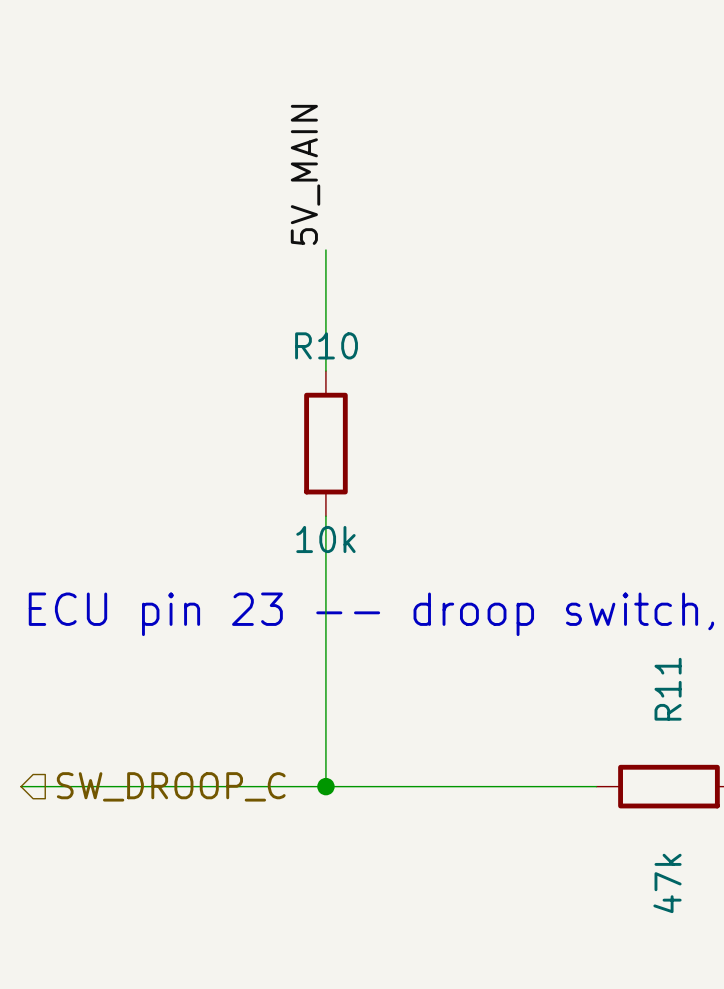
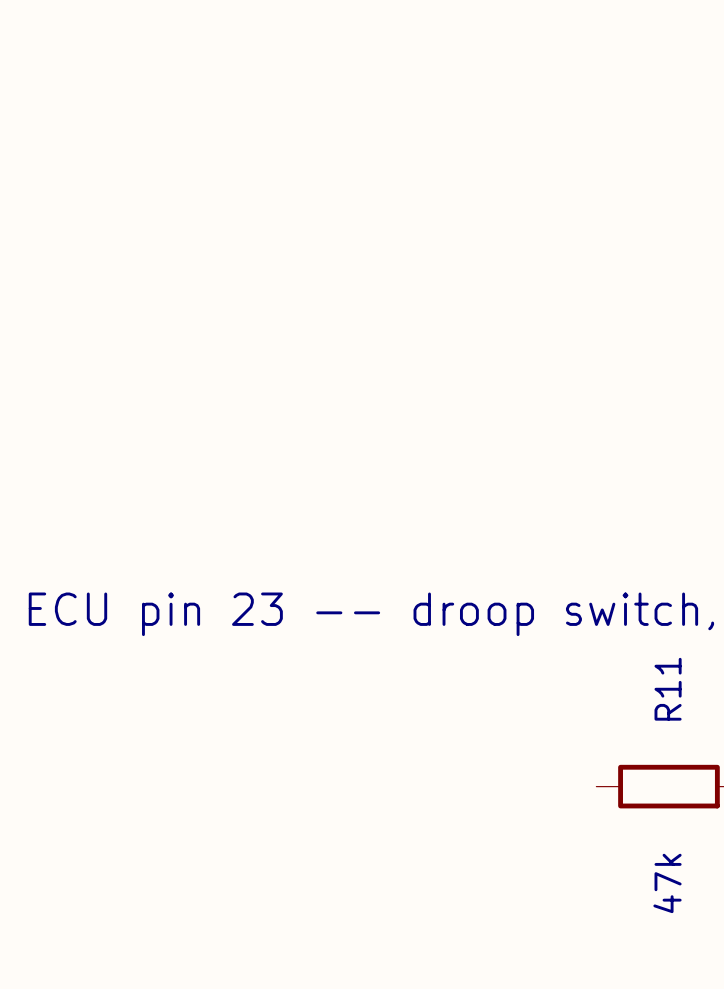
label: 5V_MAIN (305, 174) -> none
wire: (325, 249) (325, 371) -> none
R10: 10k (325, 443) -> none
wire: (325, 516) (325, 786) -> none
wire: (21, 786) (596, 786) -> none
hierarchical label: SW_DROOP_C (171, 786) -> none
junction: (325, 786) -> none

